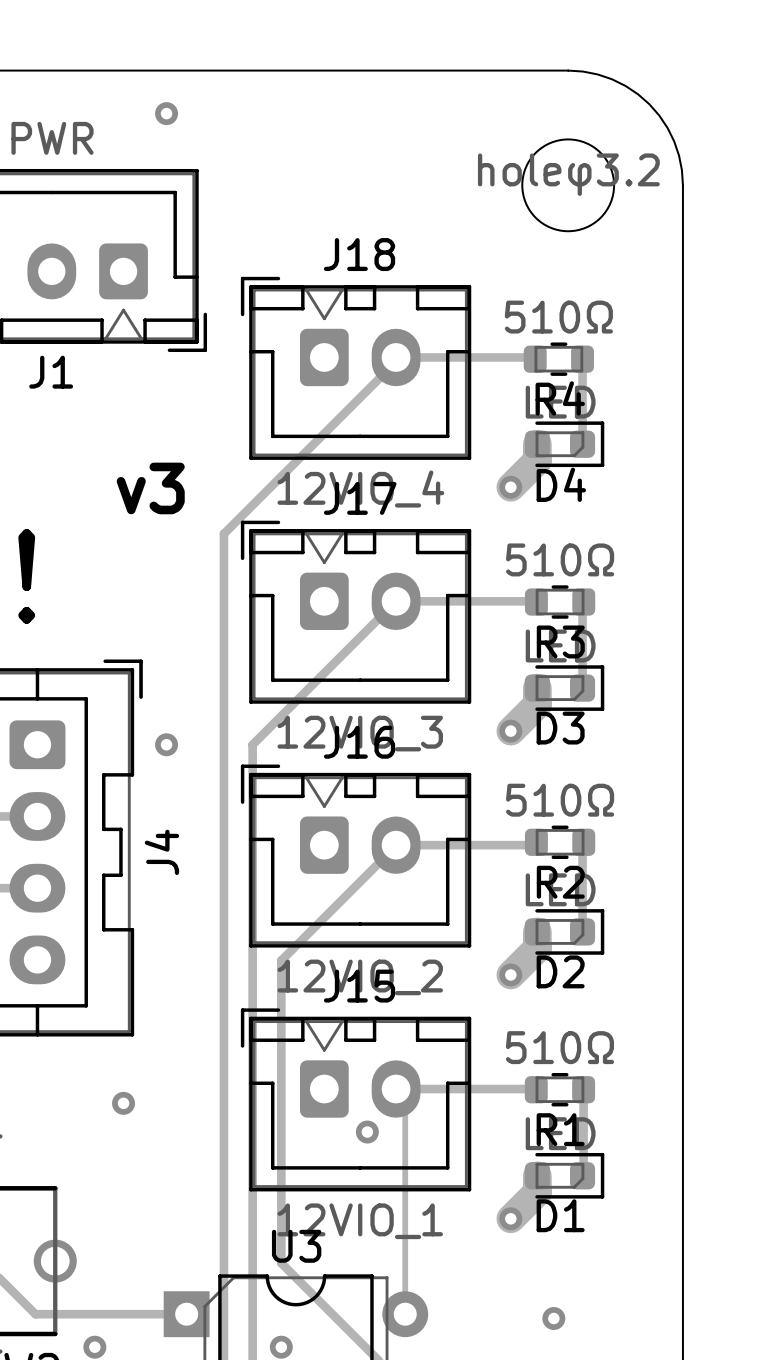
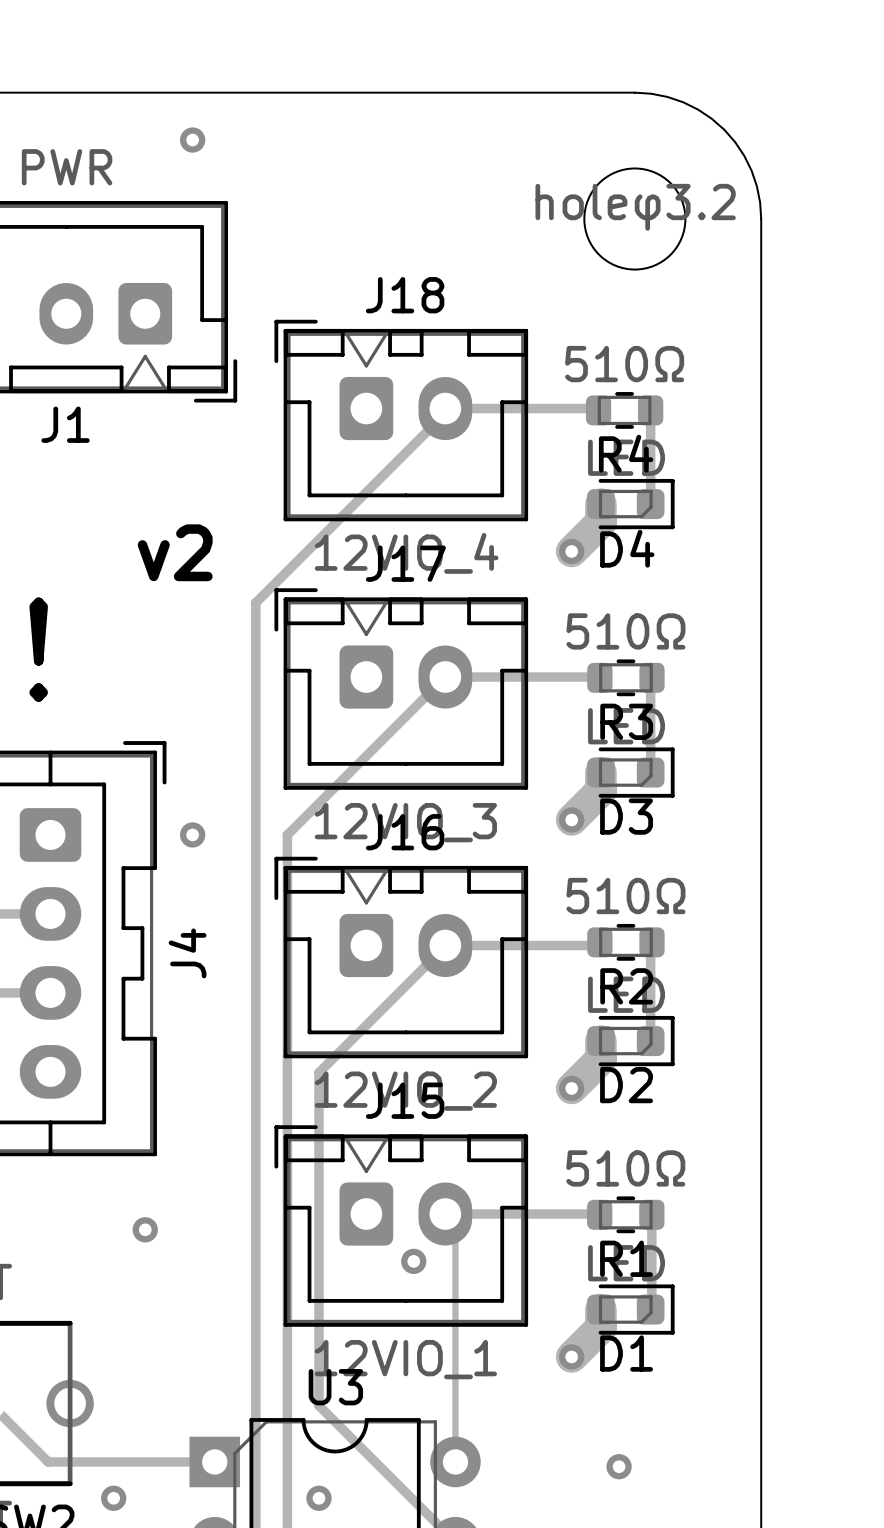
text: v3 (150, 488) -> v2 (175, 552)

